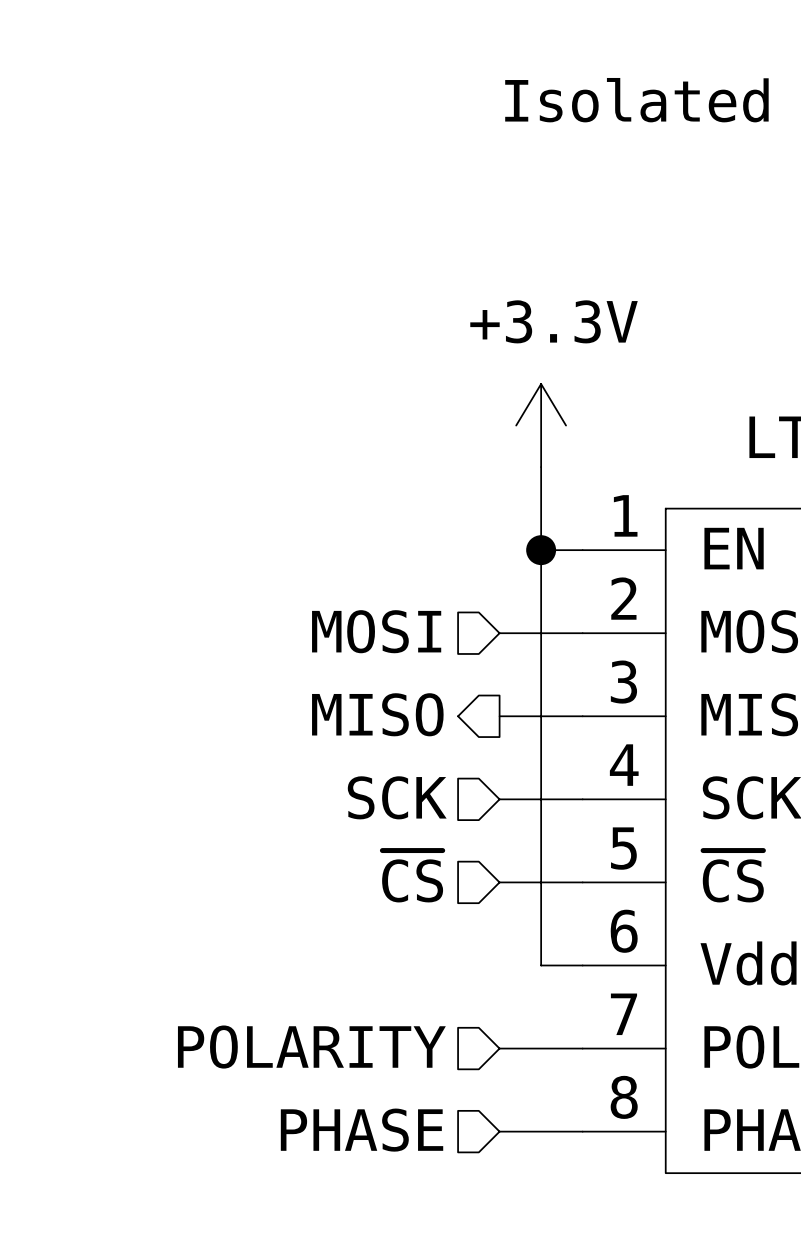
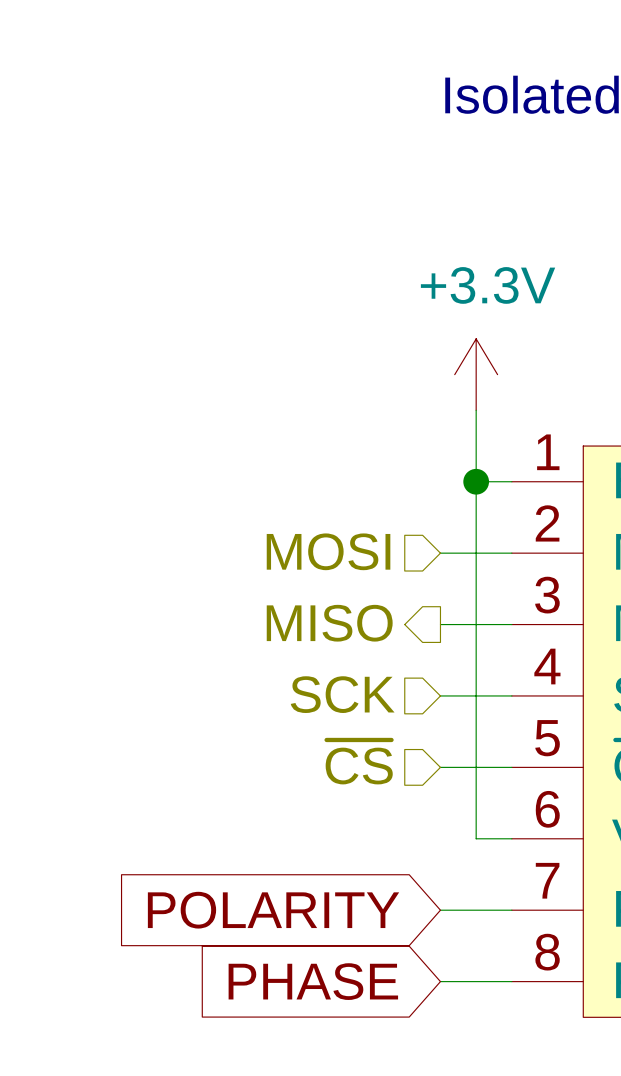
hierarchical label: POLARITY (311, 1047) -> none
global label: none -> POLARITY (273, 910)
hierarchical label: PHASE (362, 1130) -> none
global label: none -> PHASE (313, 981)

